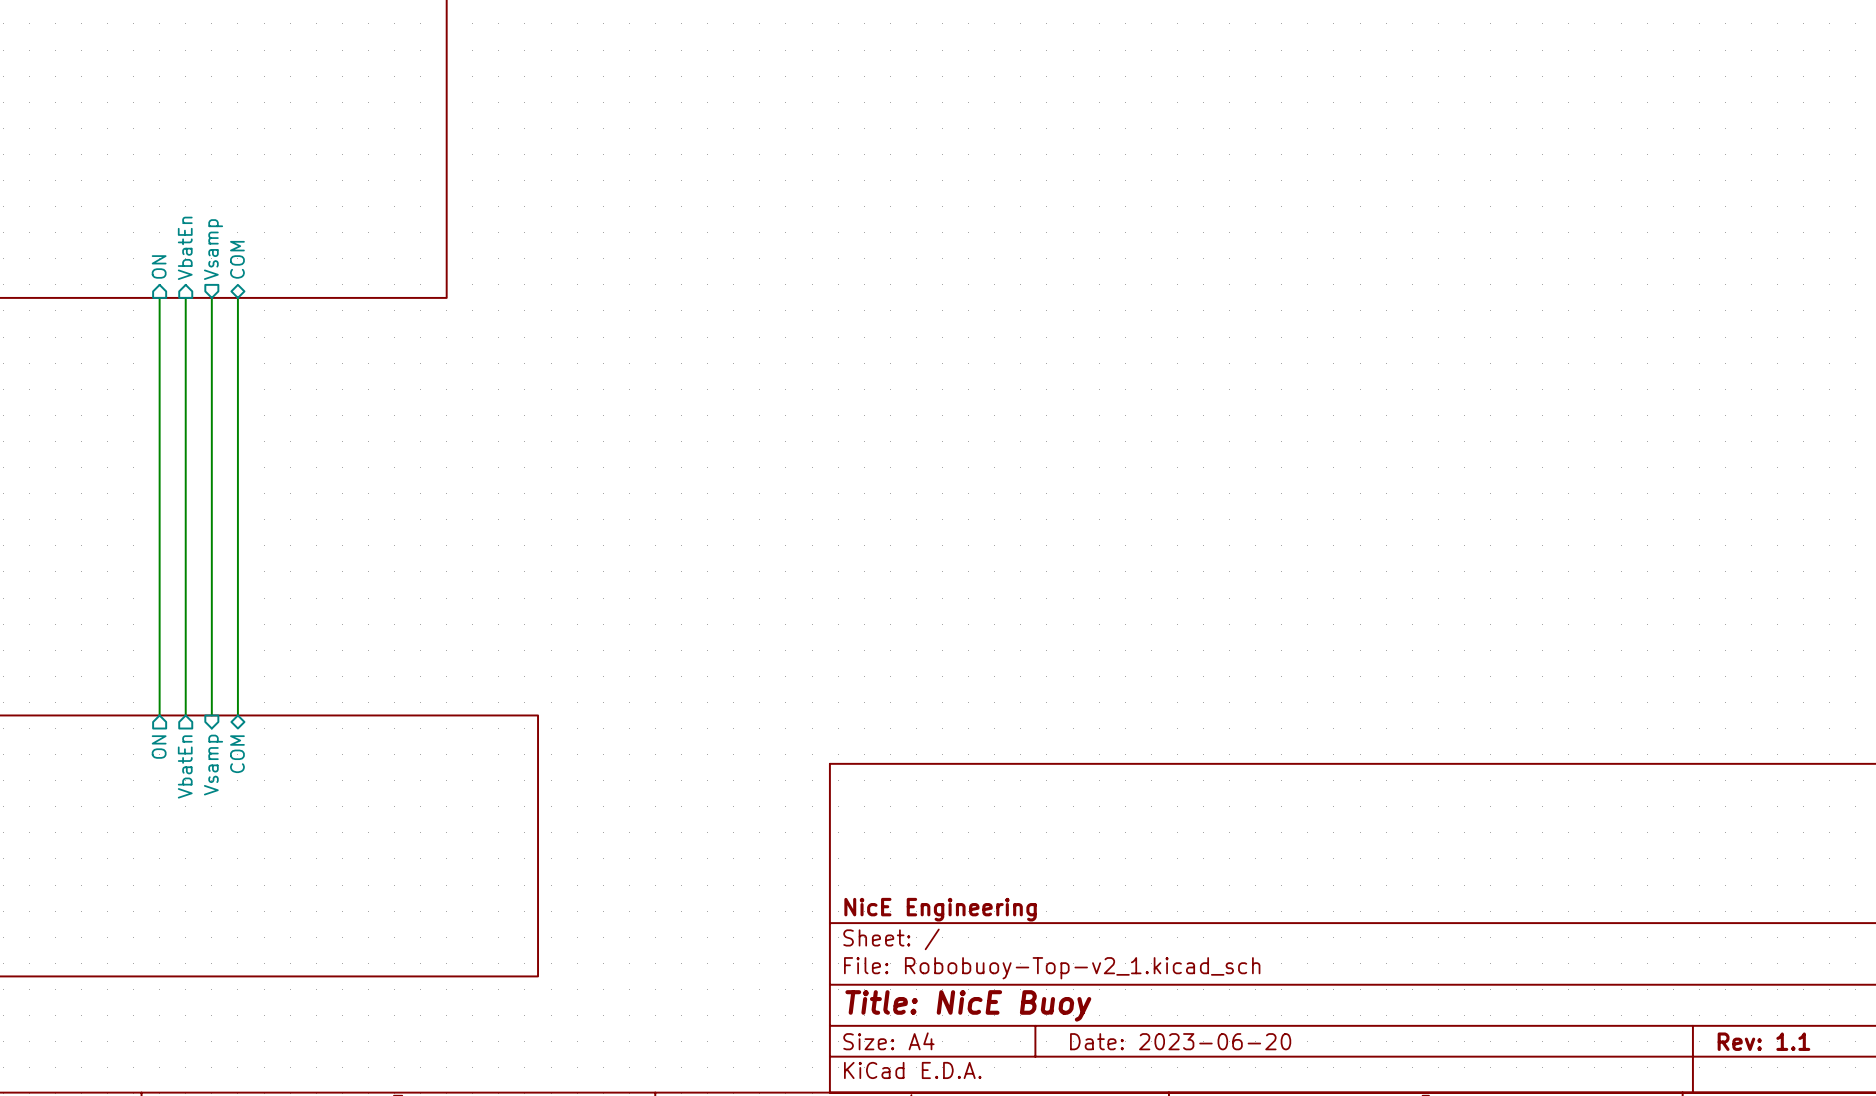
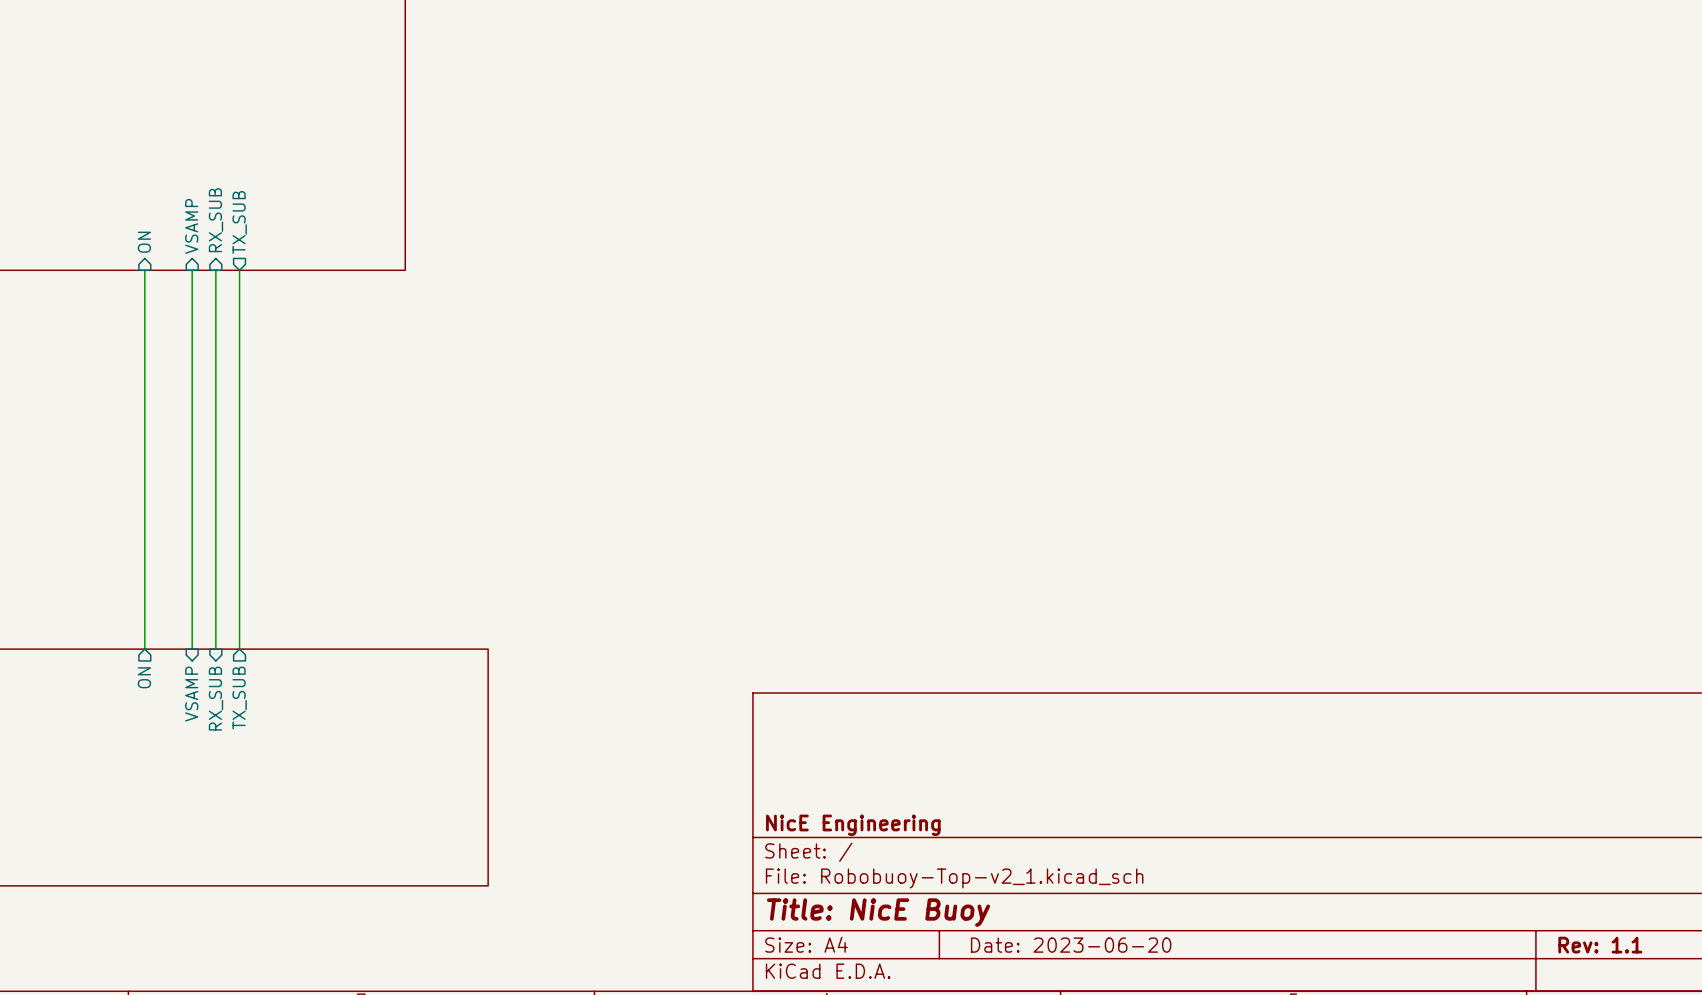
sheet pin: none -> TX_SUB (239, 222)
sheet pin: VbatEn (185, 248) -> none
sheet pin shape: output (213, 249) -> input (191, 226)
sheet pin: Vsamp (213, 249) -> VSAMP (191, 226)
sheet pin shape: bidirectional (237, 259) -> input (215, 220)
sheet pin: COM (237, 259) -> RX_SUB (215, 220)
wire: (185, 297) (185, 715) -> (239, 270) (239, 649)
sheet pin shape: bidirectional (237, 754) -> input (215, 698)
sheet pin: COM (237, 754) -> RX_SUB (215, 698)
sheet pin: Vsamp (213, 765) -> VSAMP (191, 694)
sheet pin: VbatEn (185, 766) -> none
sheet pin: none -> TX_SUB (239, 698)

